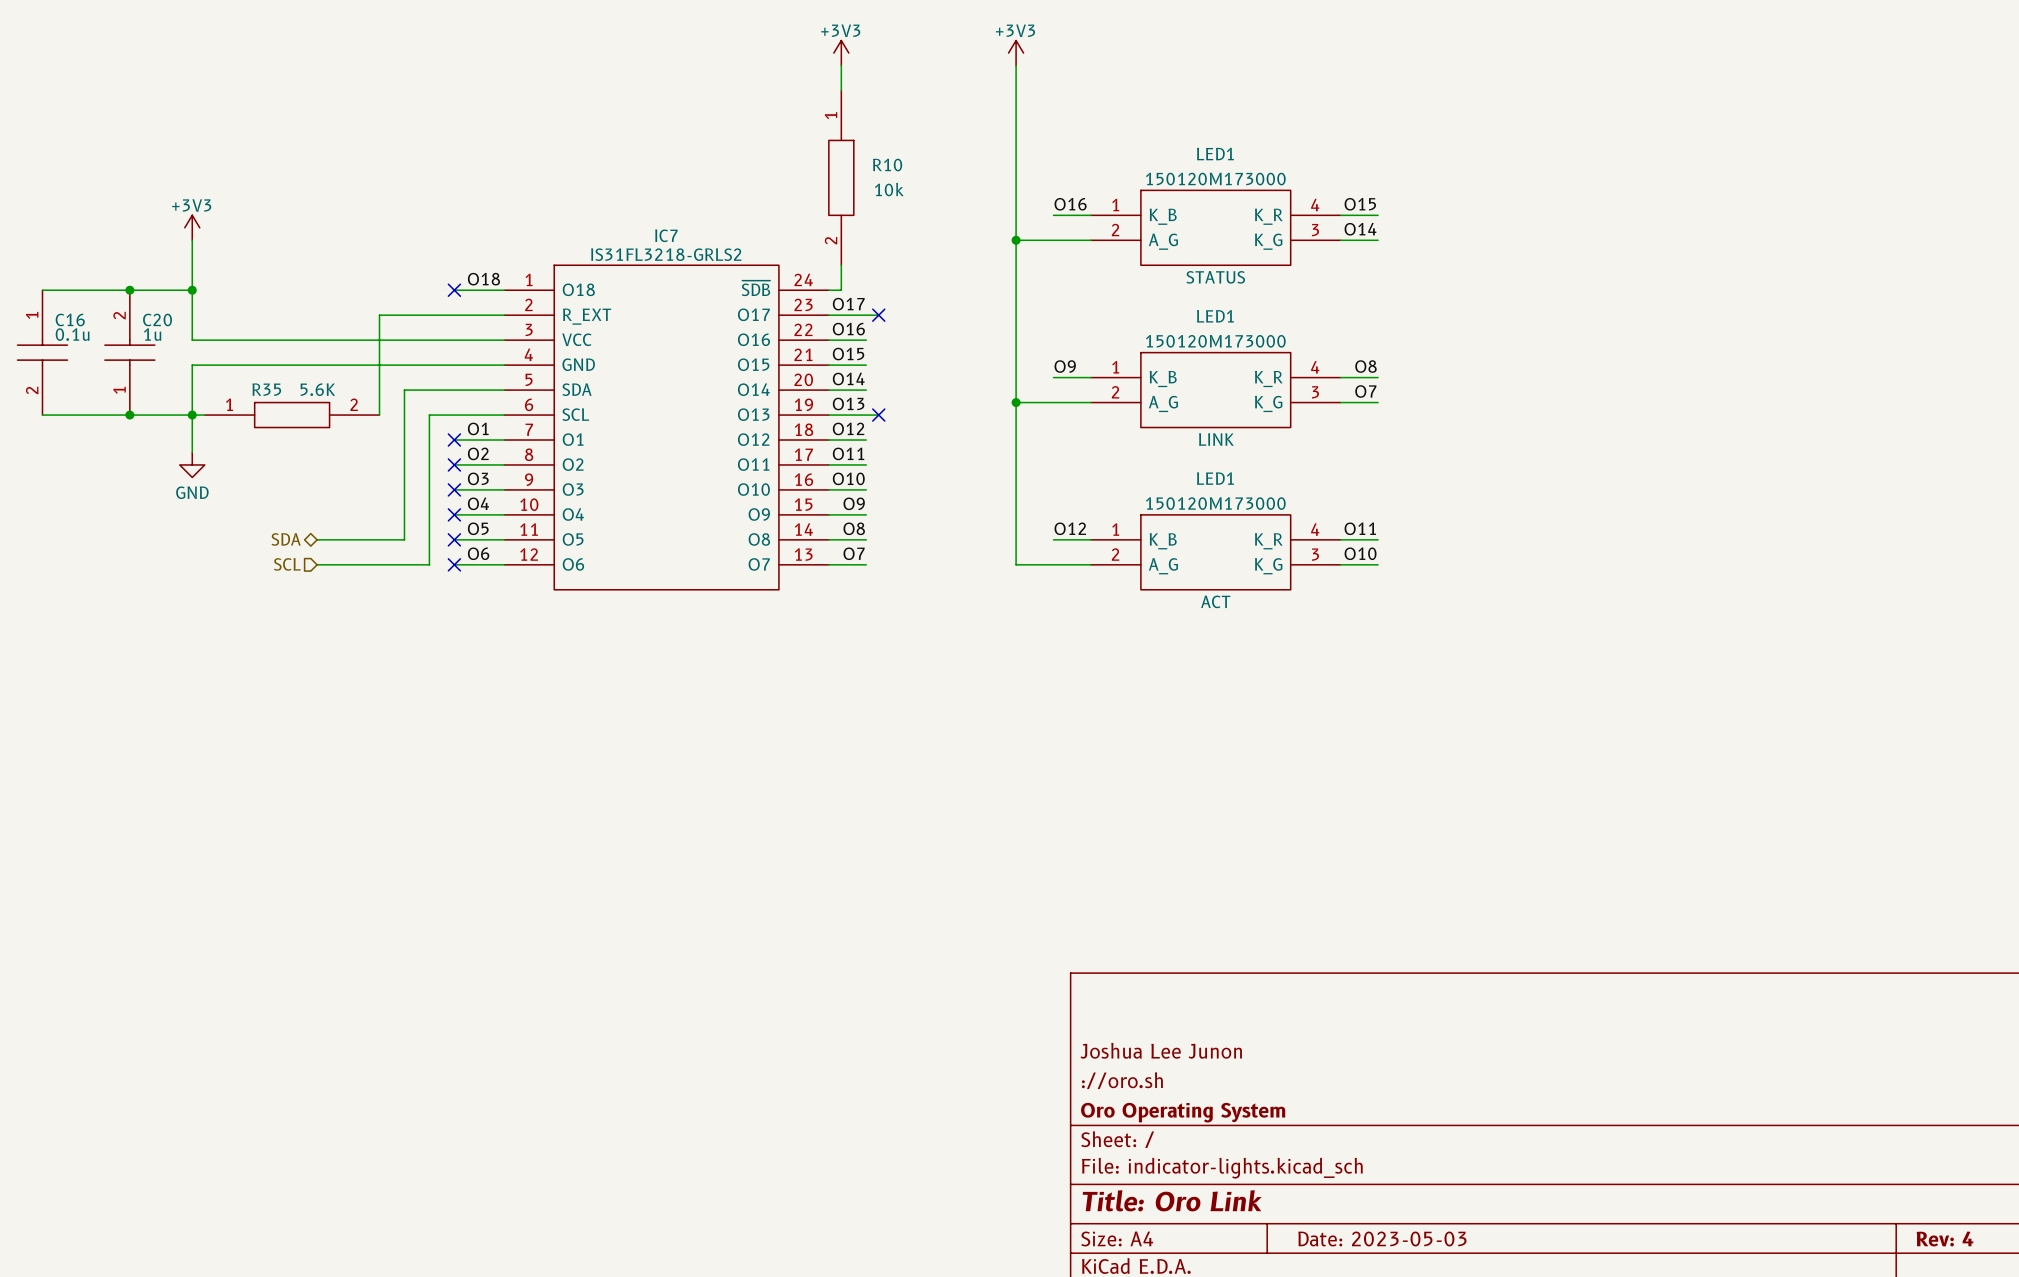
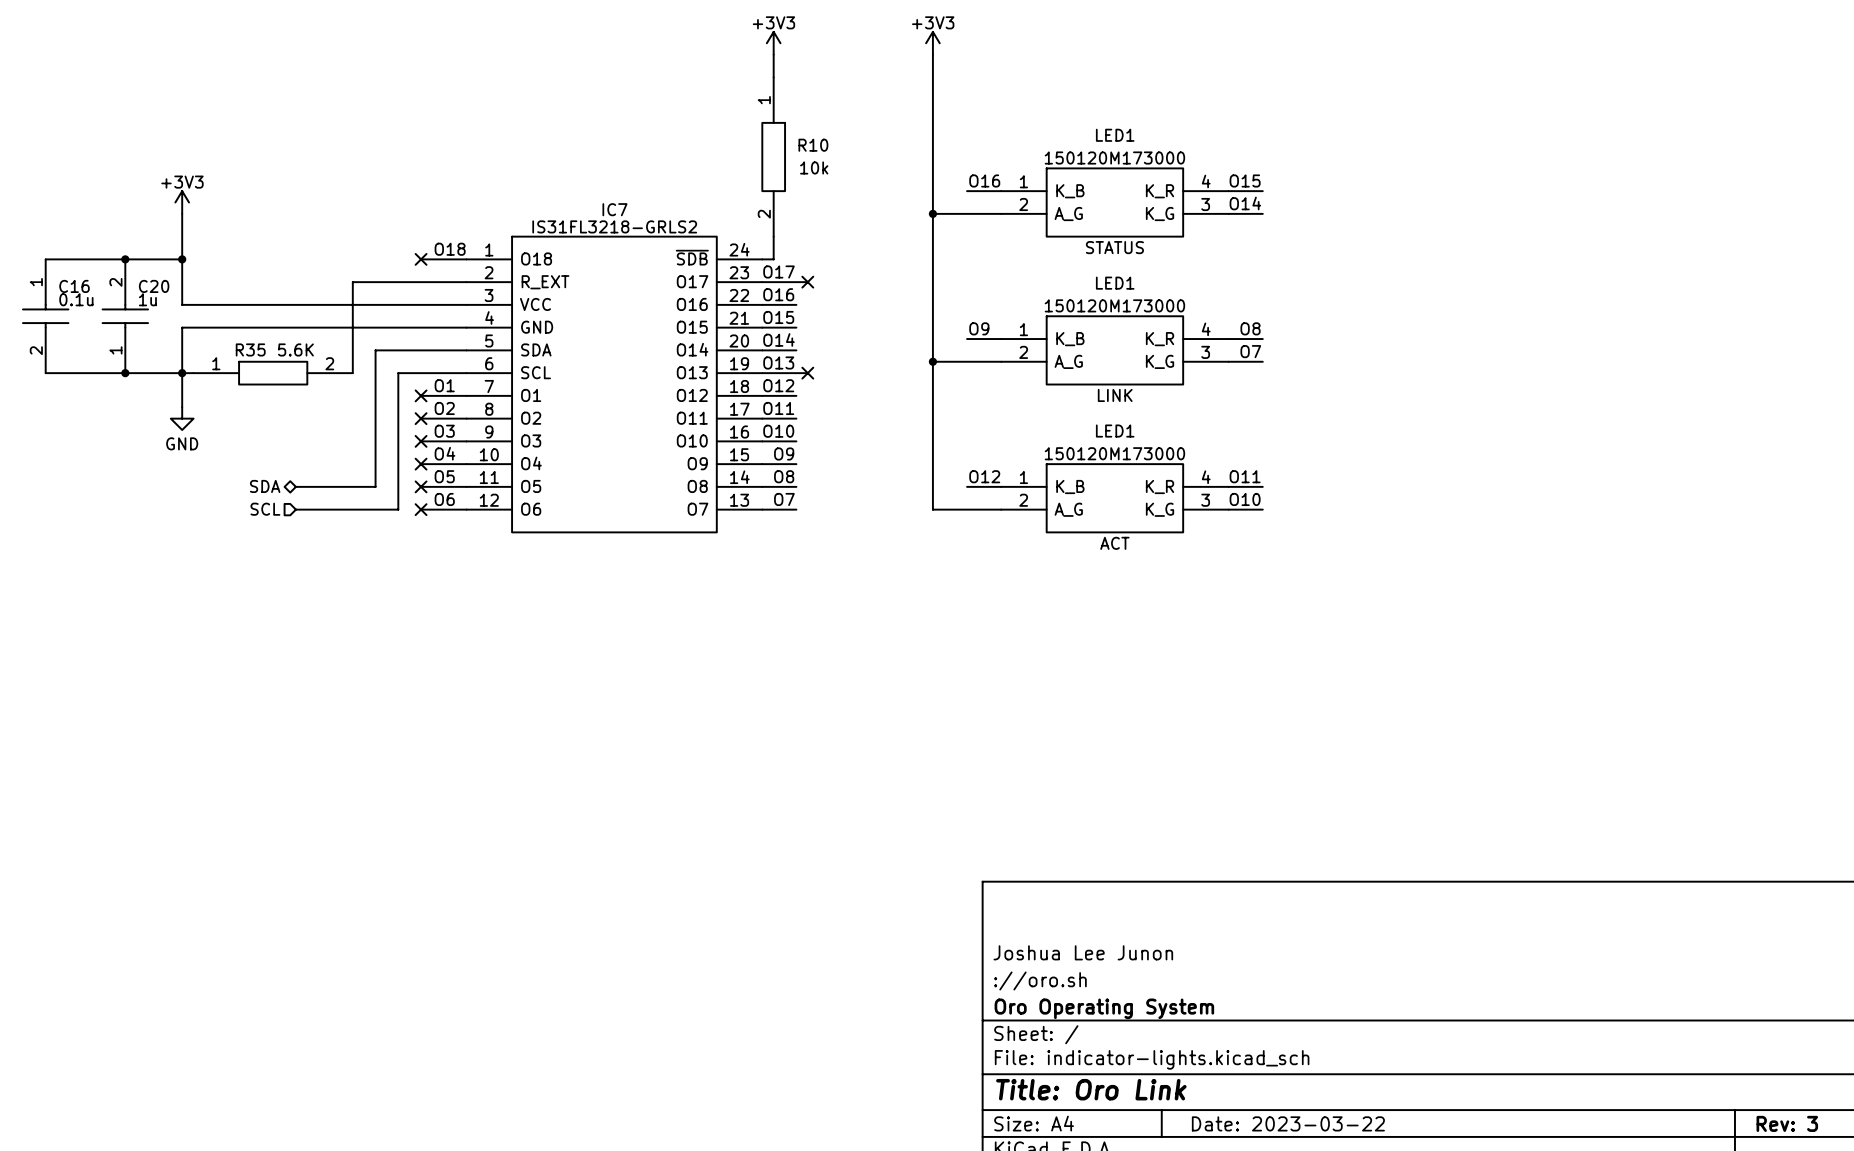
title block: Date: 2023-05-03 (1382, 1238) -> Date: 2023-03-22 (1288, 1123)
title block: Rev: 4 (1945, 1239) -> Rev: 3 (1787, 1123)

